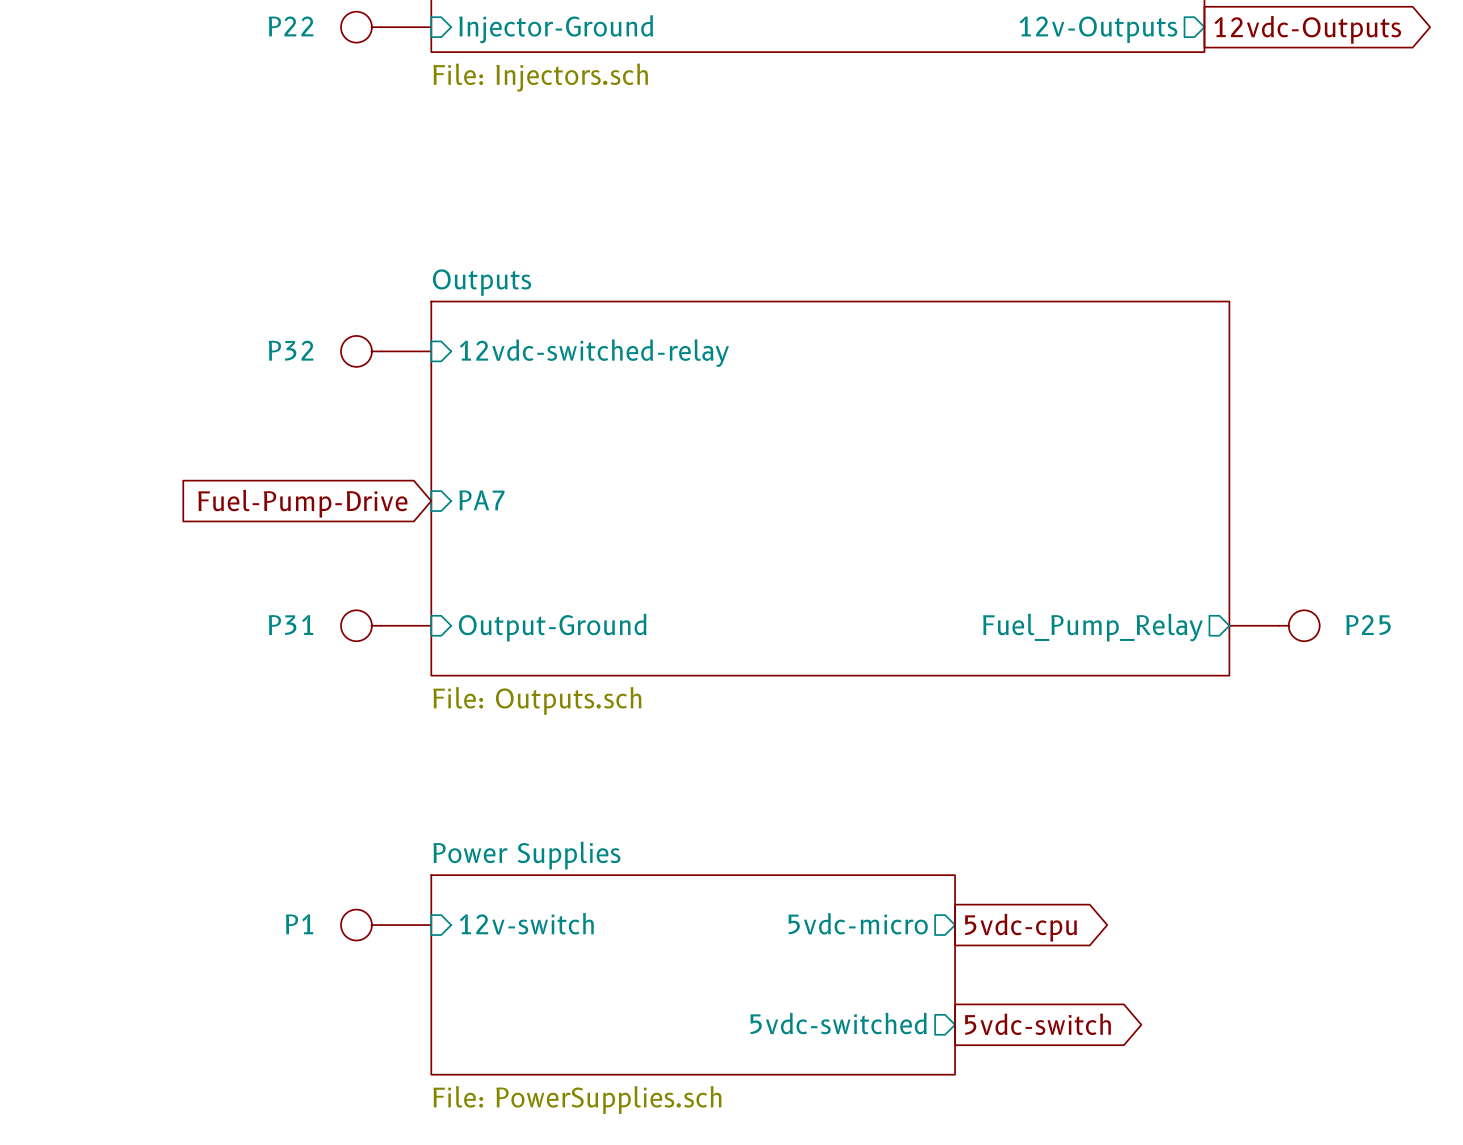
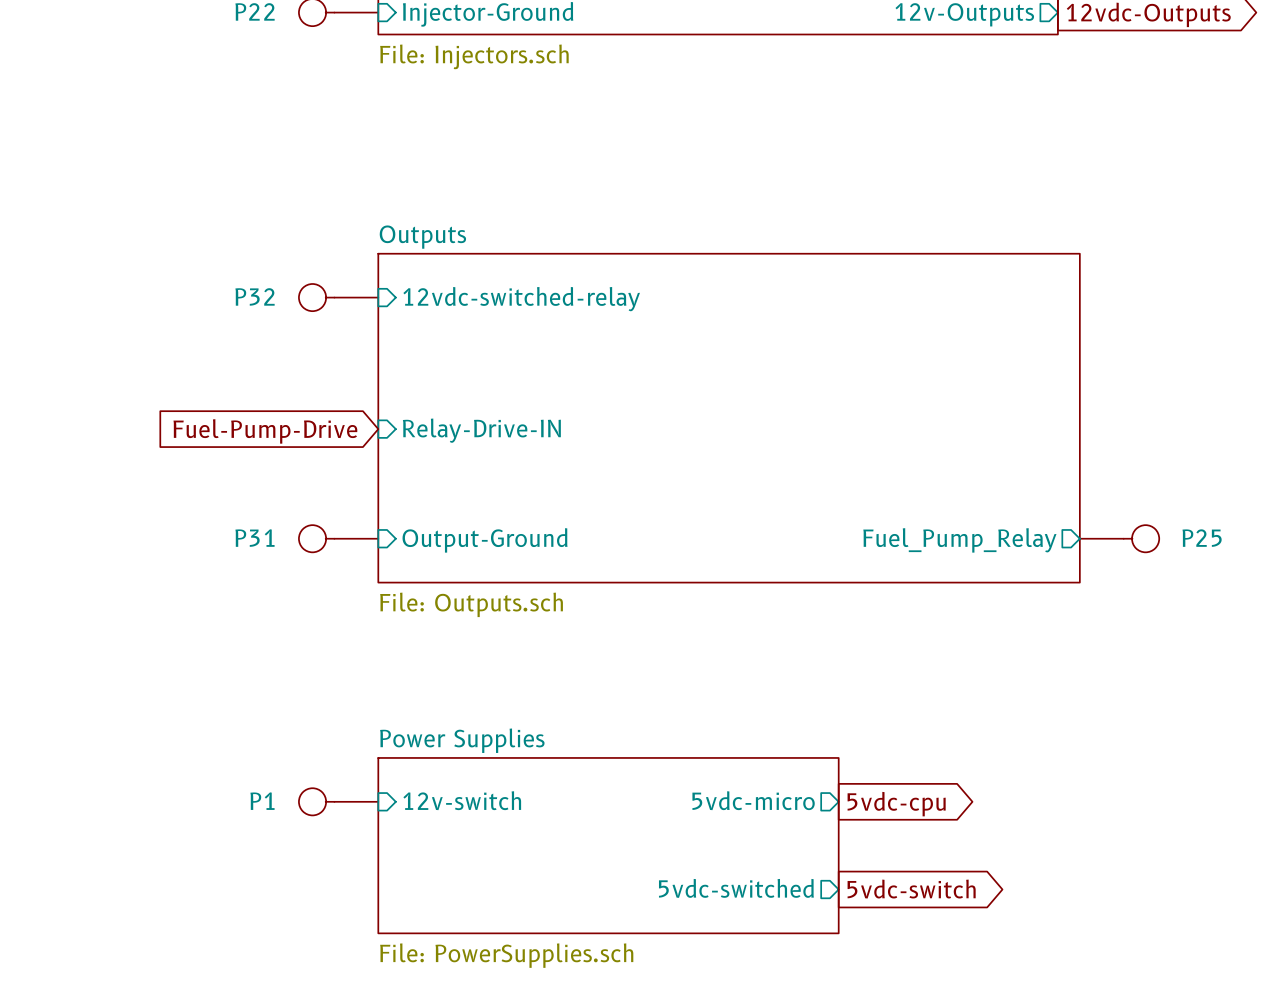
sheet pin: PA7 (481, 500) -> Relay-Drive-IN (481, 430)

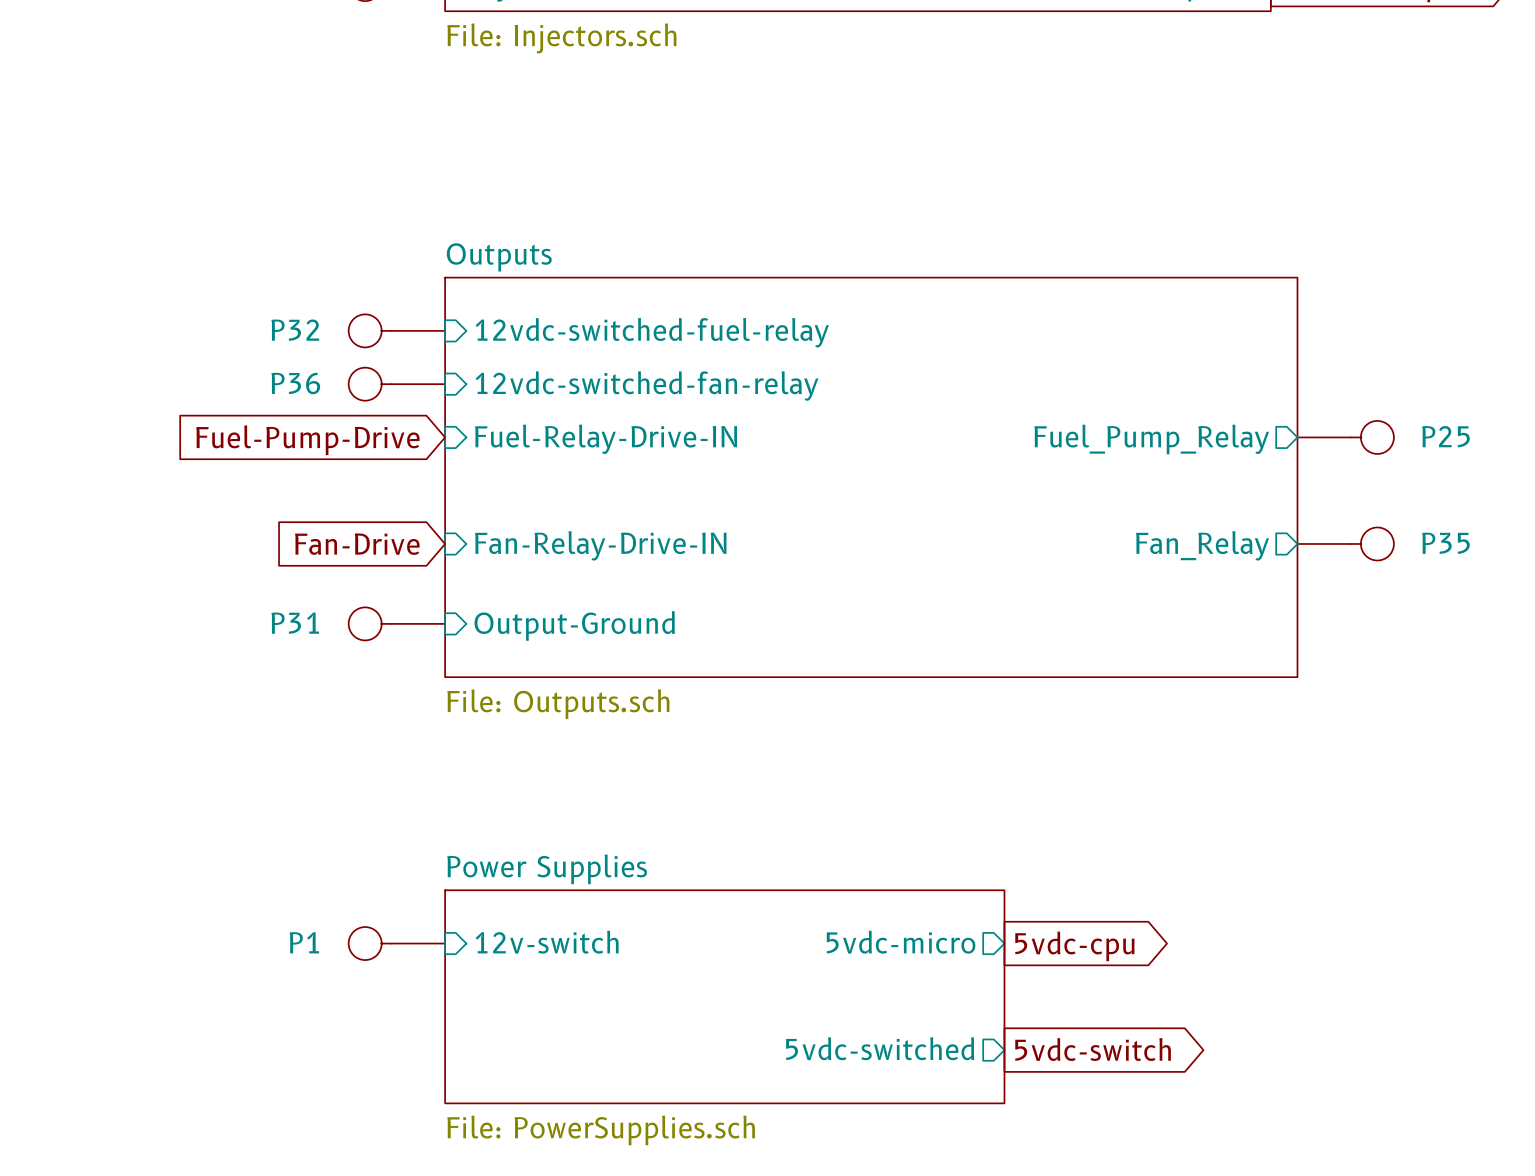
sheet pin: 12vdc-switched-relay (521, 299) -> 12vdc-switched-fuel-relay (652, 332)
P36: none -> (396, 384)
sheet pin: none -> 12vdc-switched-fan-relay (646, 386)
sheet pin: none -> Fuel-Relay-Drive-IN (606, 439)
sheet pin: Relay-Drive-IN (481, 430) -> none
global label position: Fuel-Pump-Drive (265, 431) -> Fuel-Pump-Drive (307, 440)
P35: none -> (1345, 543)
global label: none -> Fan-Drive (357, 544)
sheet pin: none -> Fan-Relay-Drive-IN (600, 545)
sheet pin: none -> Fan_Relay (1202, 545)
P25 position: (1119, 538) -> (1345, 437)
sheet pin position: Fuel_Pump_Relay (959, 540) -> Fuel_Pump_Relay (1151, 439)

